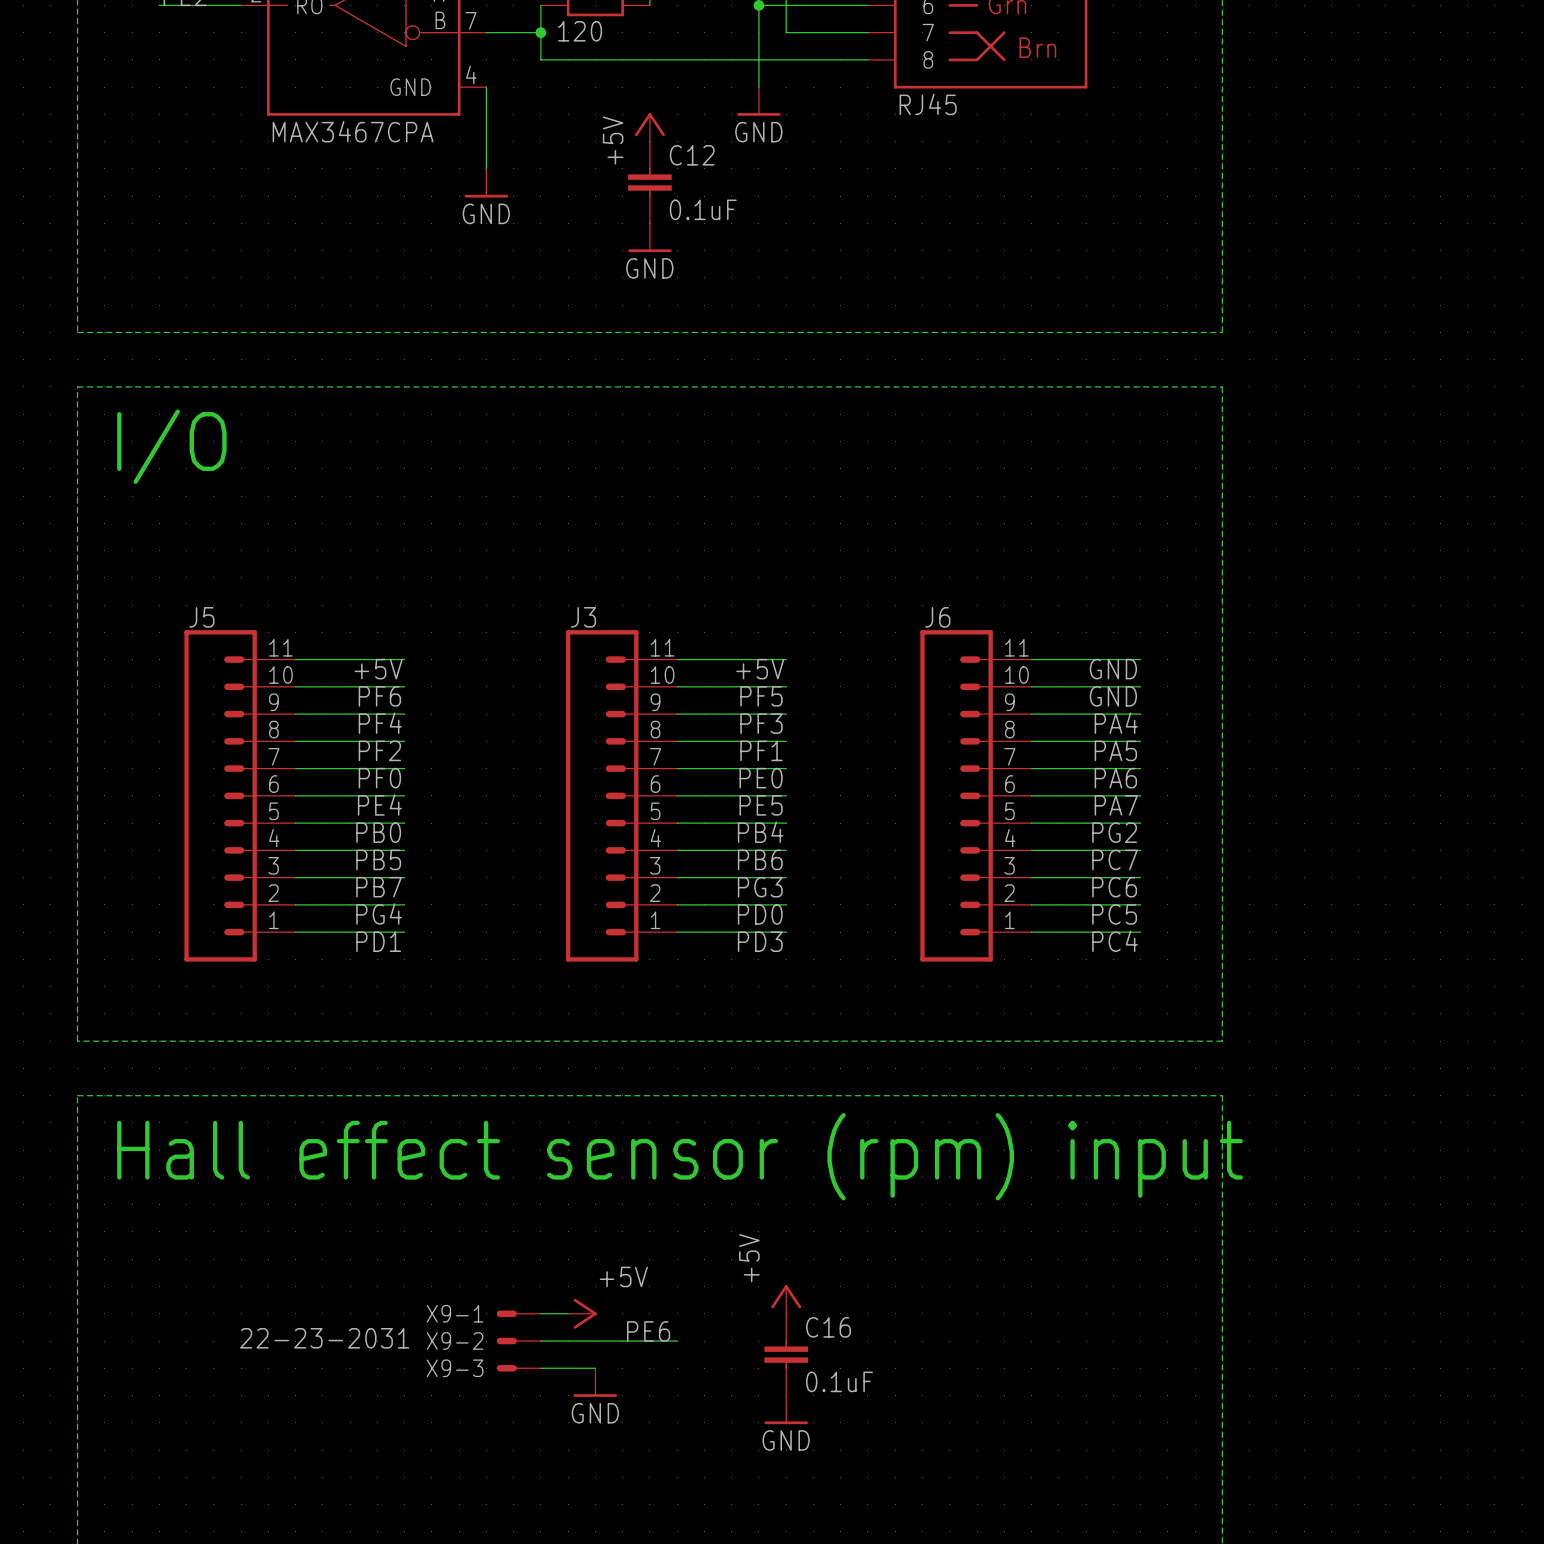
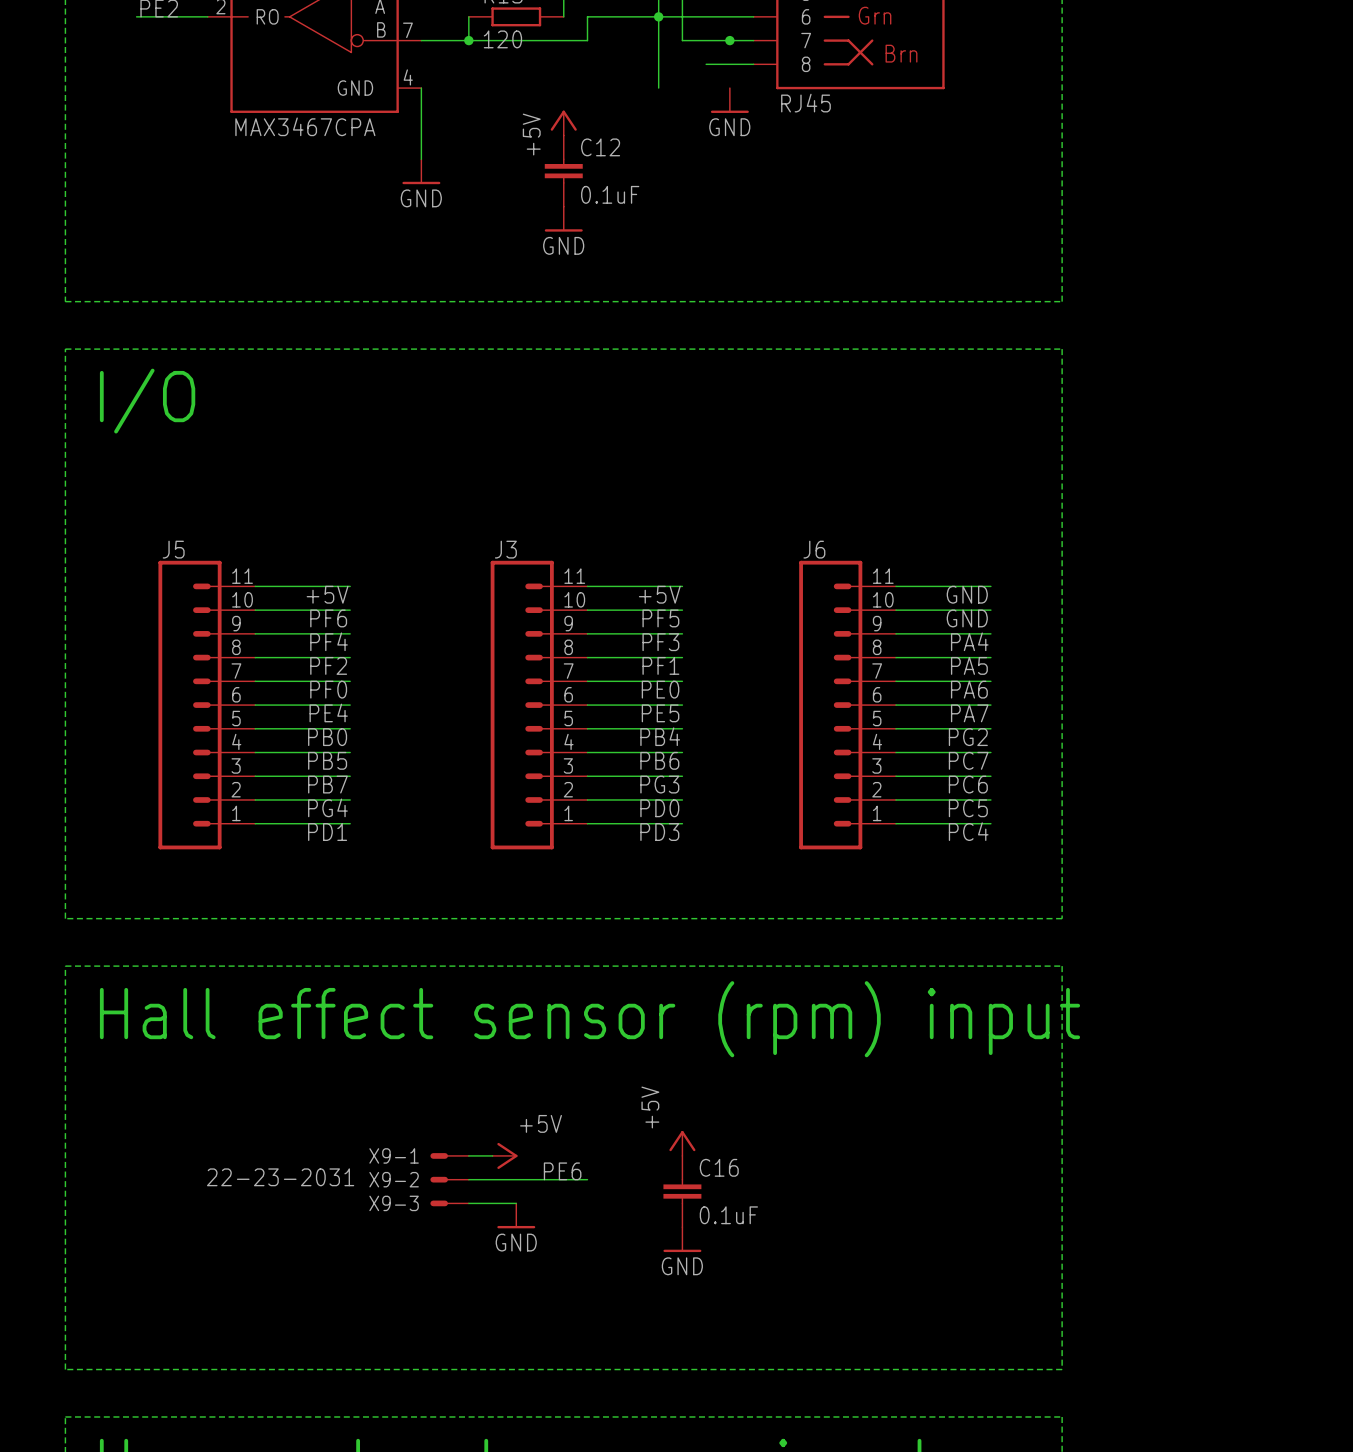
wire: (540, 32) (540, 59) (813, 59) -> (468, 40) (587, 40) (587, 16) (658, 16)
junction: none -> (729, 40)
power symbol position: GND (758, 101) -> GND (729, 100)

